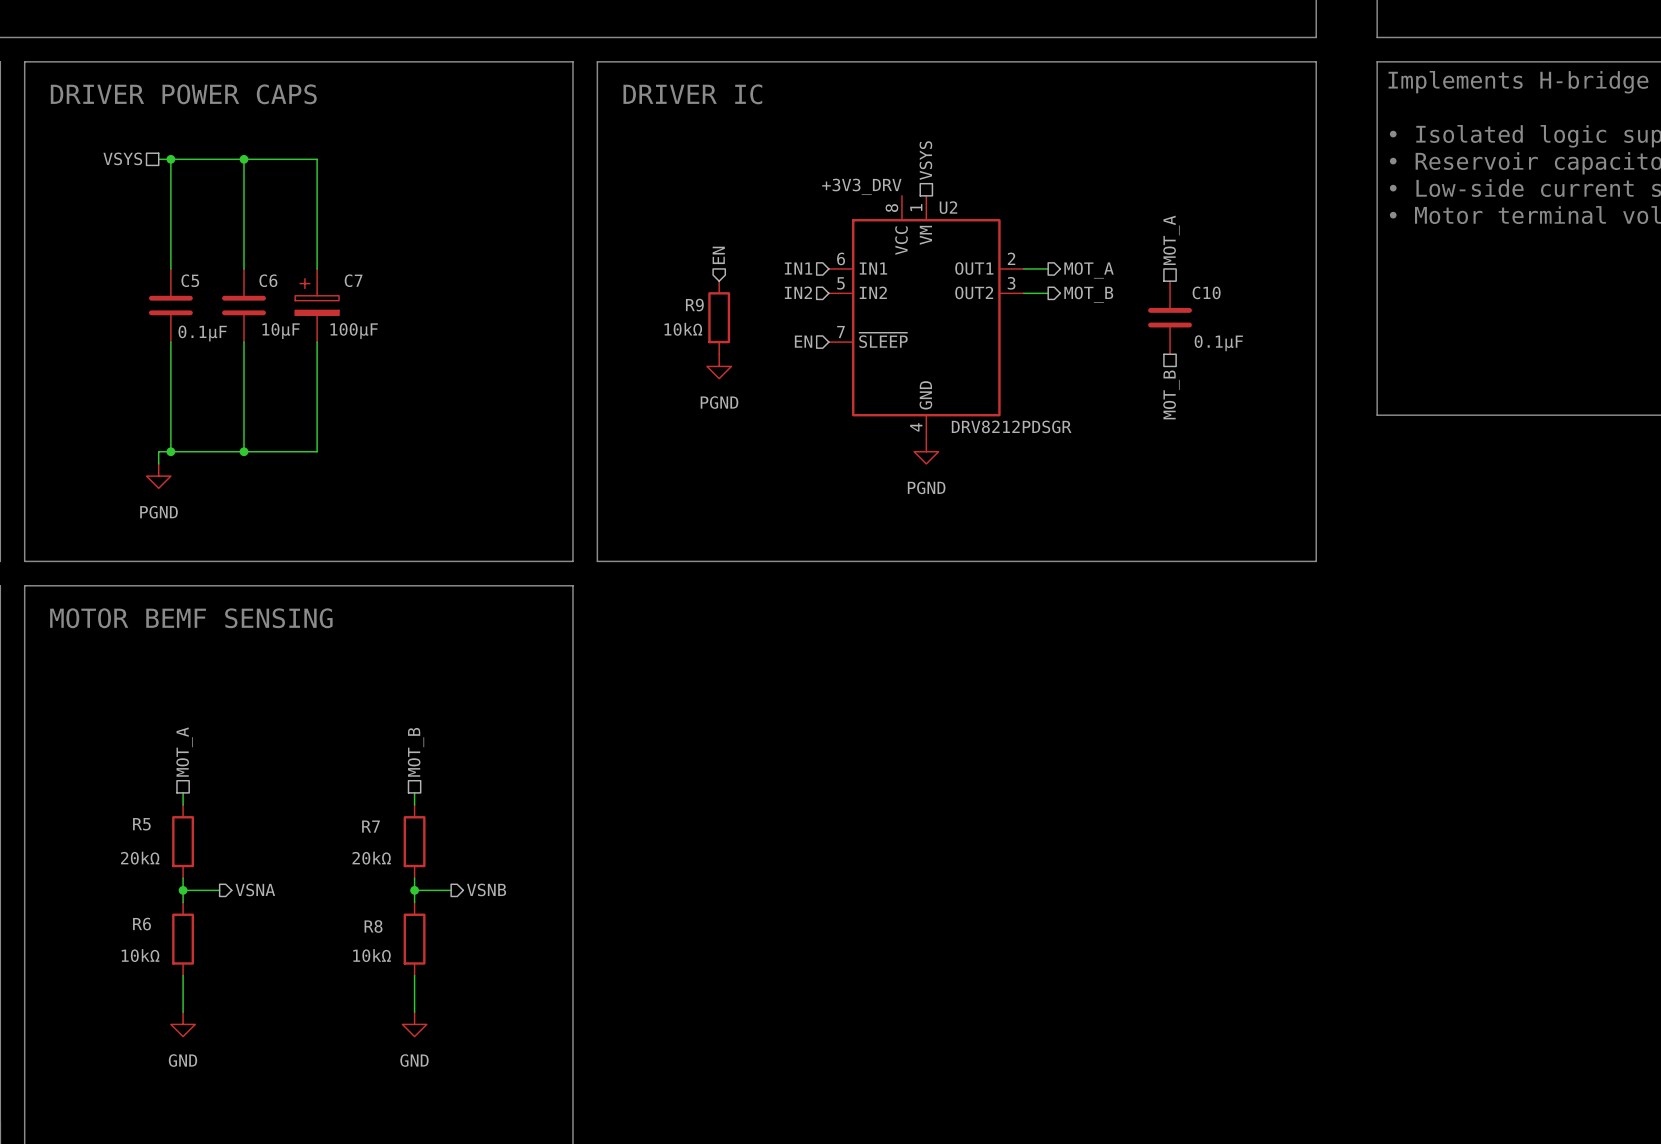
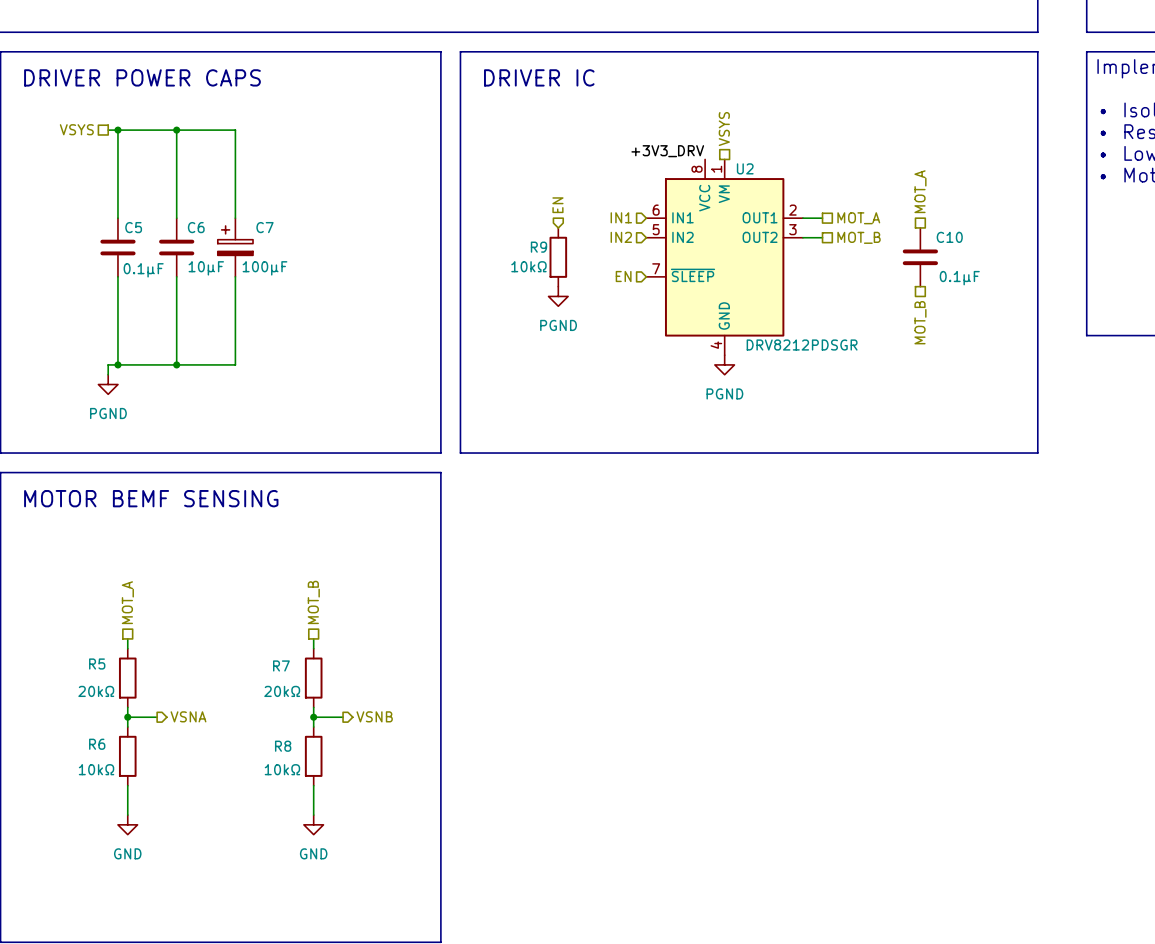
hierarchical label shape: output (1089, 270) -> passive (858, 218)
hierarchical label shape: output (1088, 294) -> passive (859, 237)

